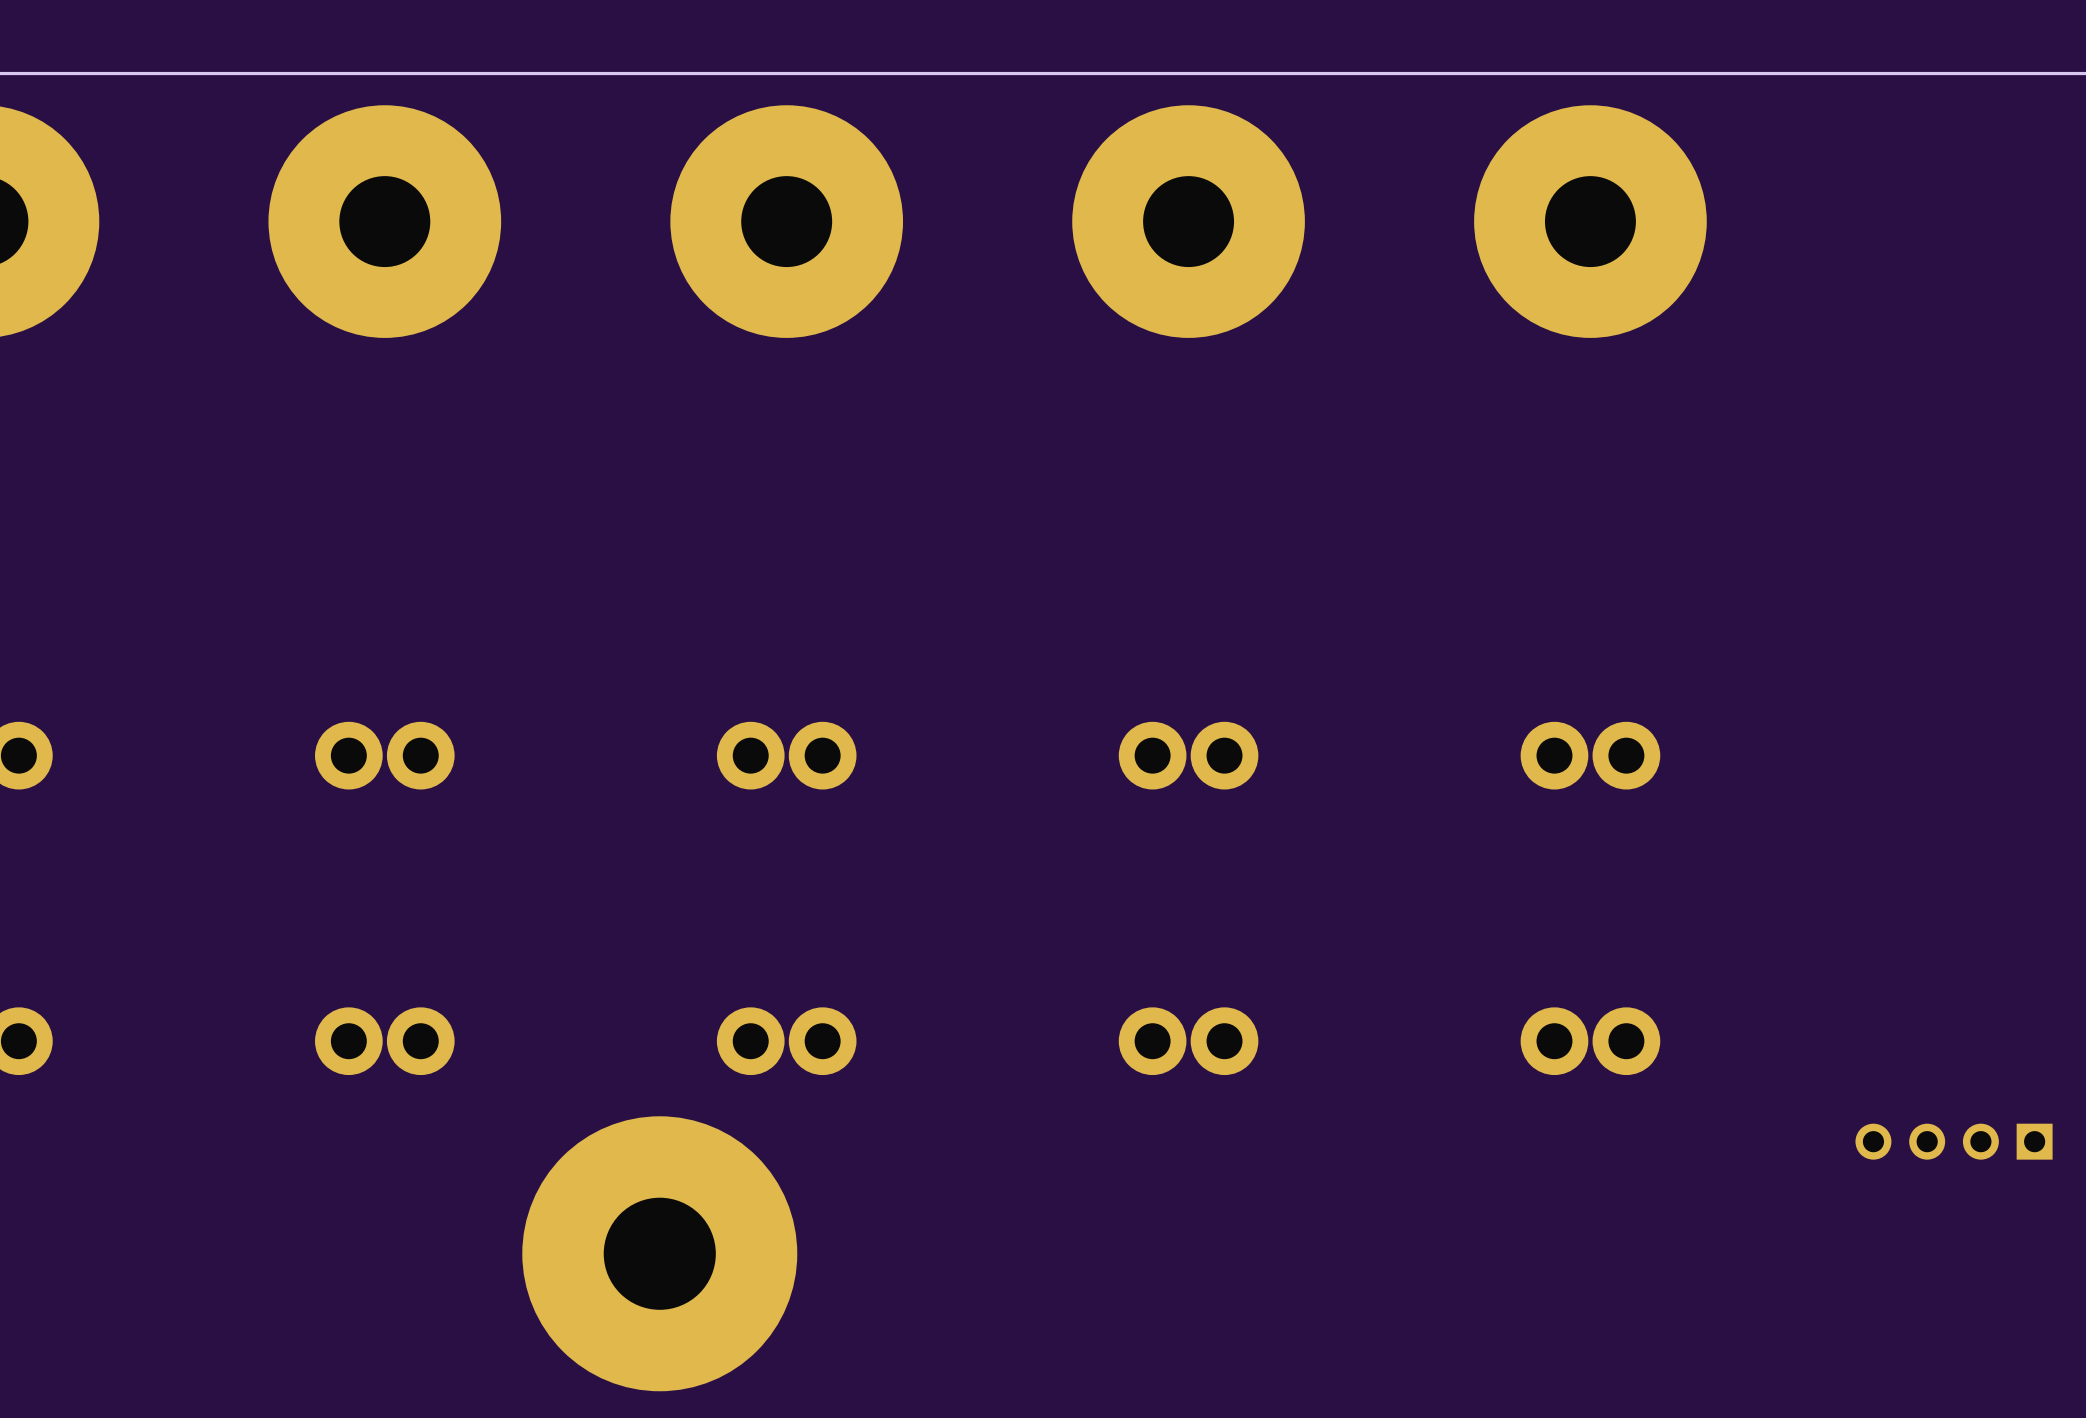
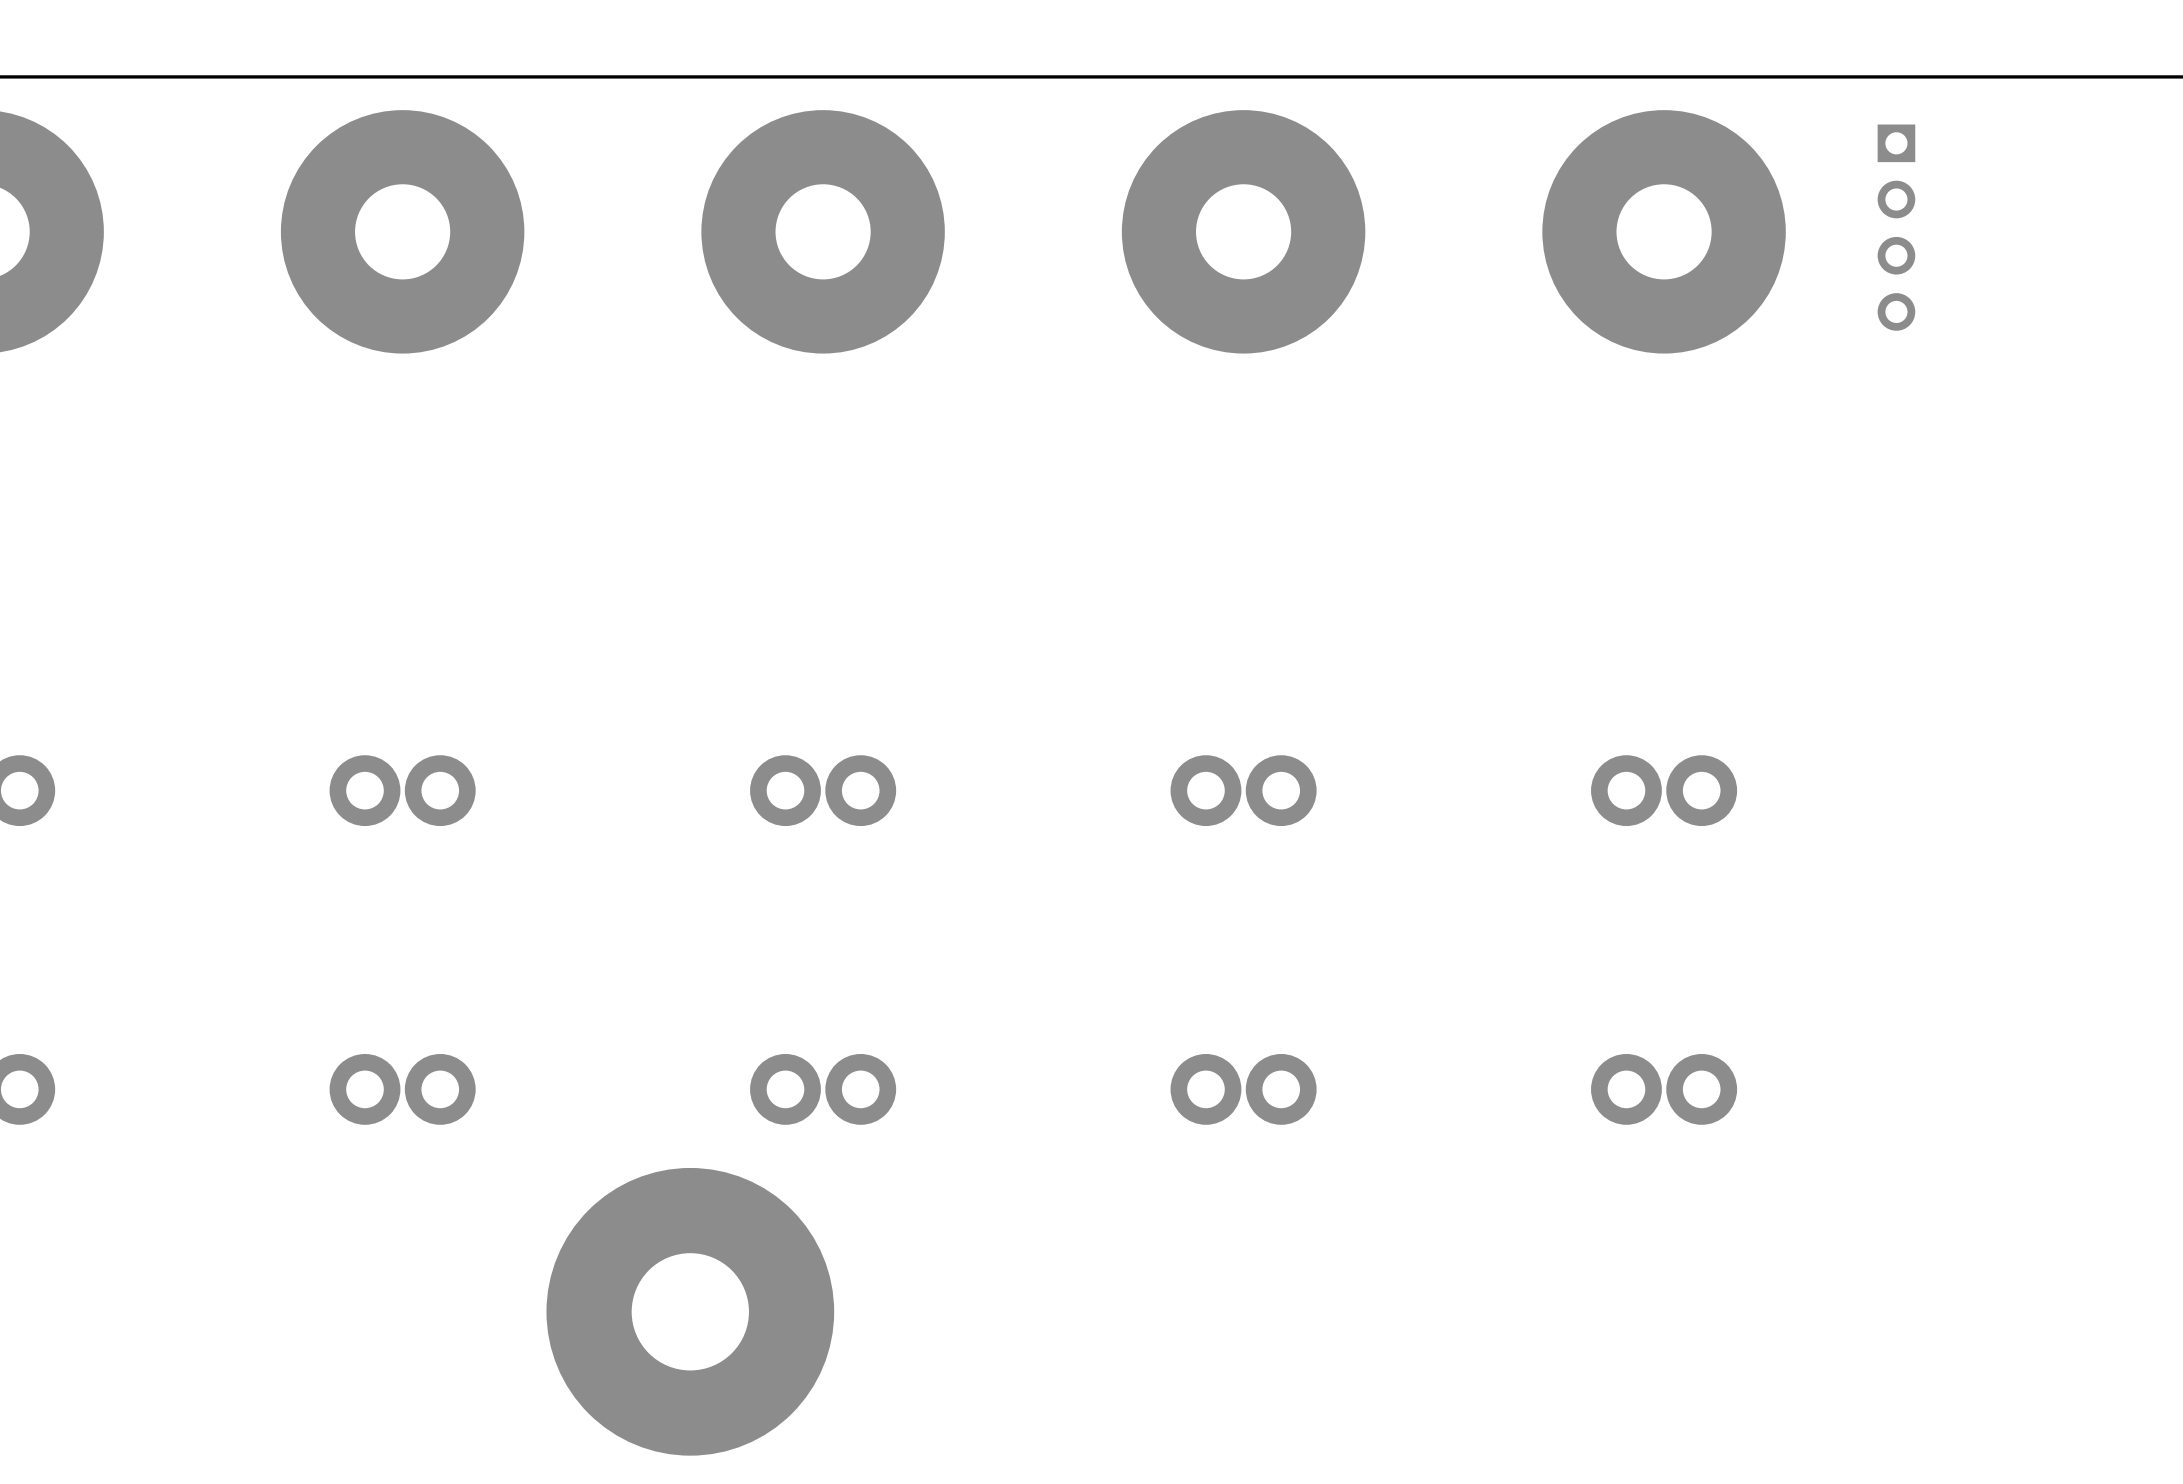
part: none -> (1896, 227)
part: (1954, 1141) -> none

